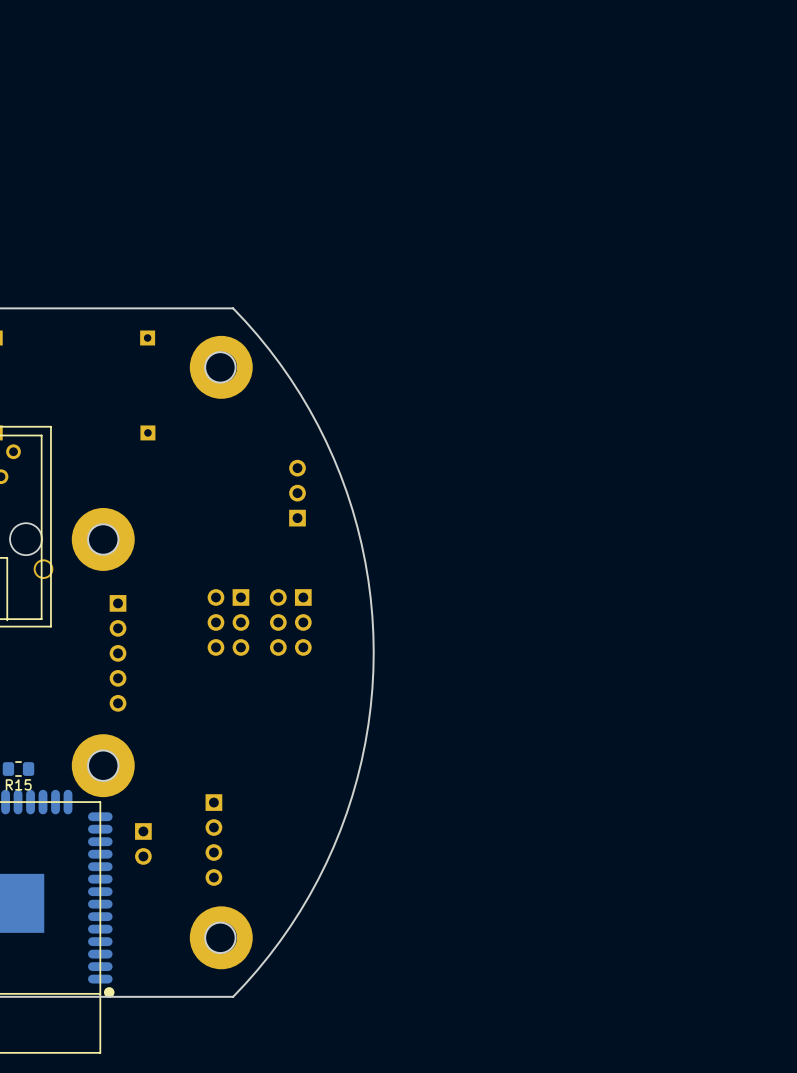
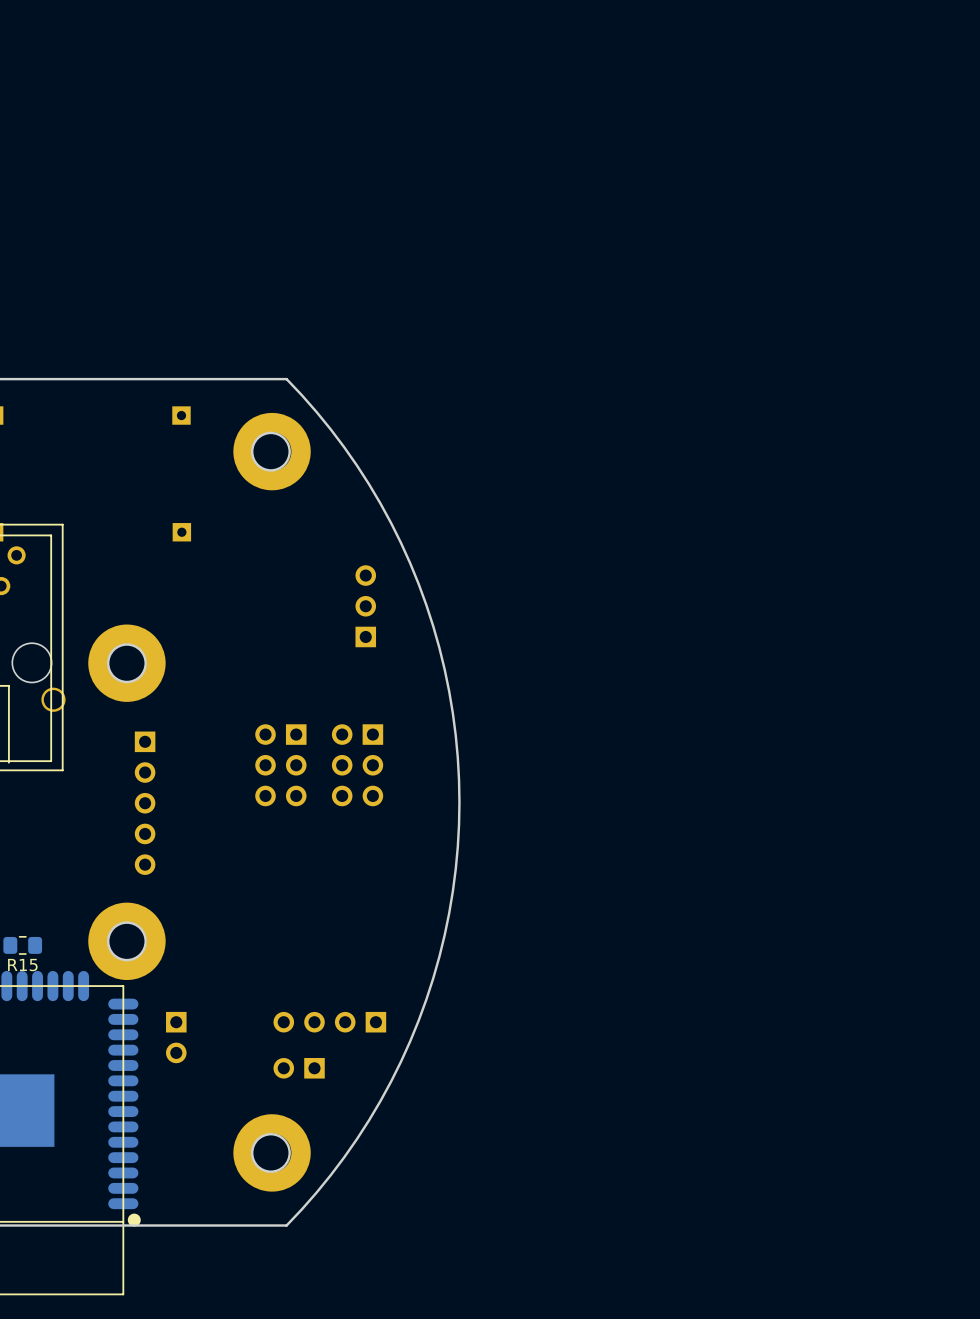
part rotation: 0° (213, 840) -> 90° clockwise (329, 1022)
part position: (213, 840) -> (329, 1022)
part: none -> (299, 1068)

